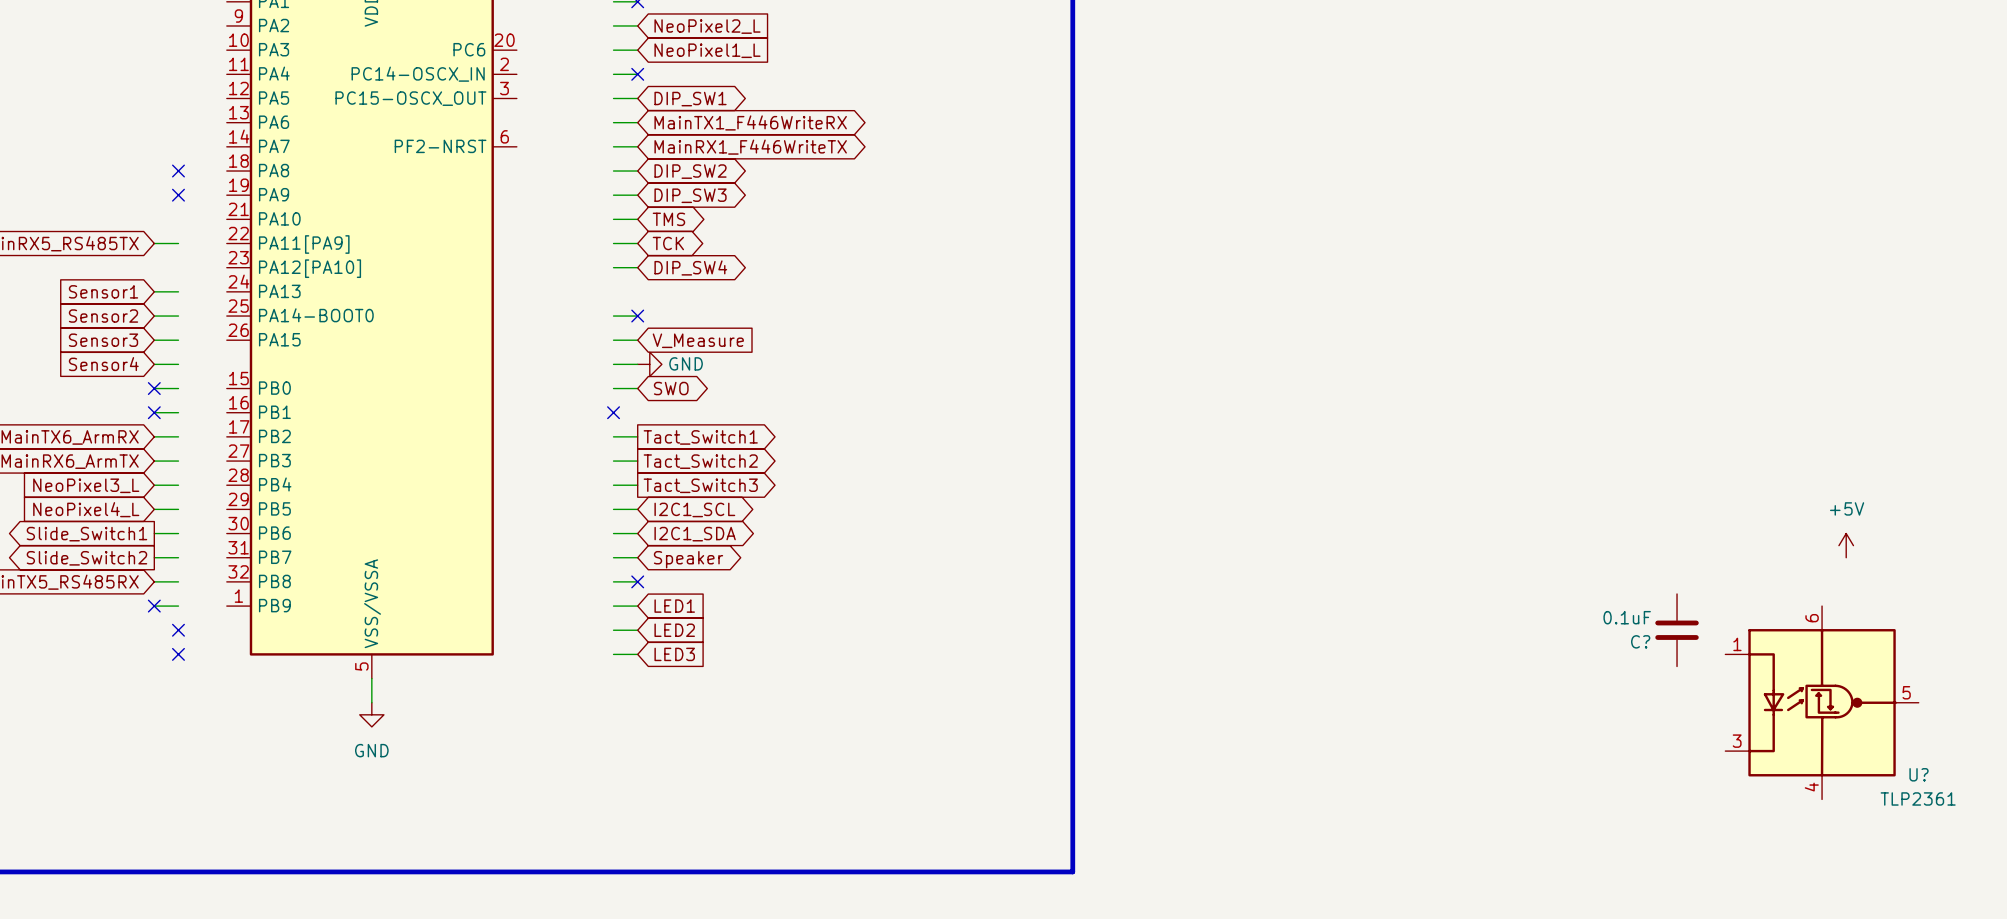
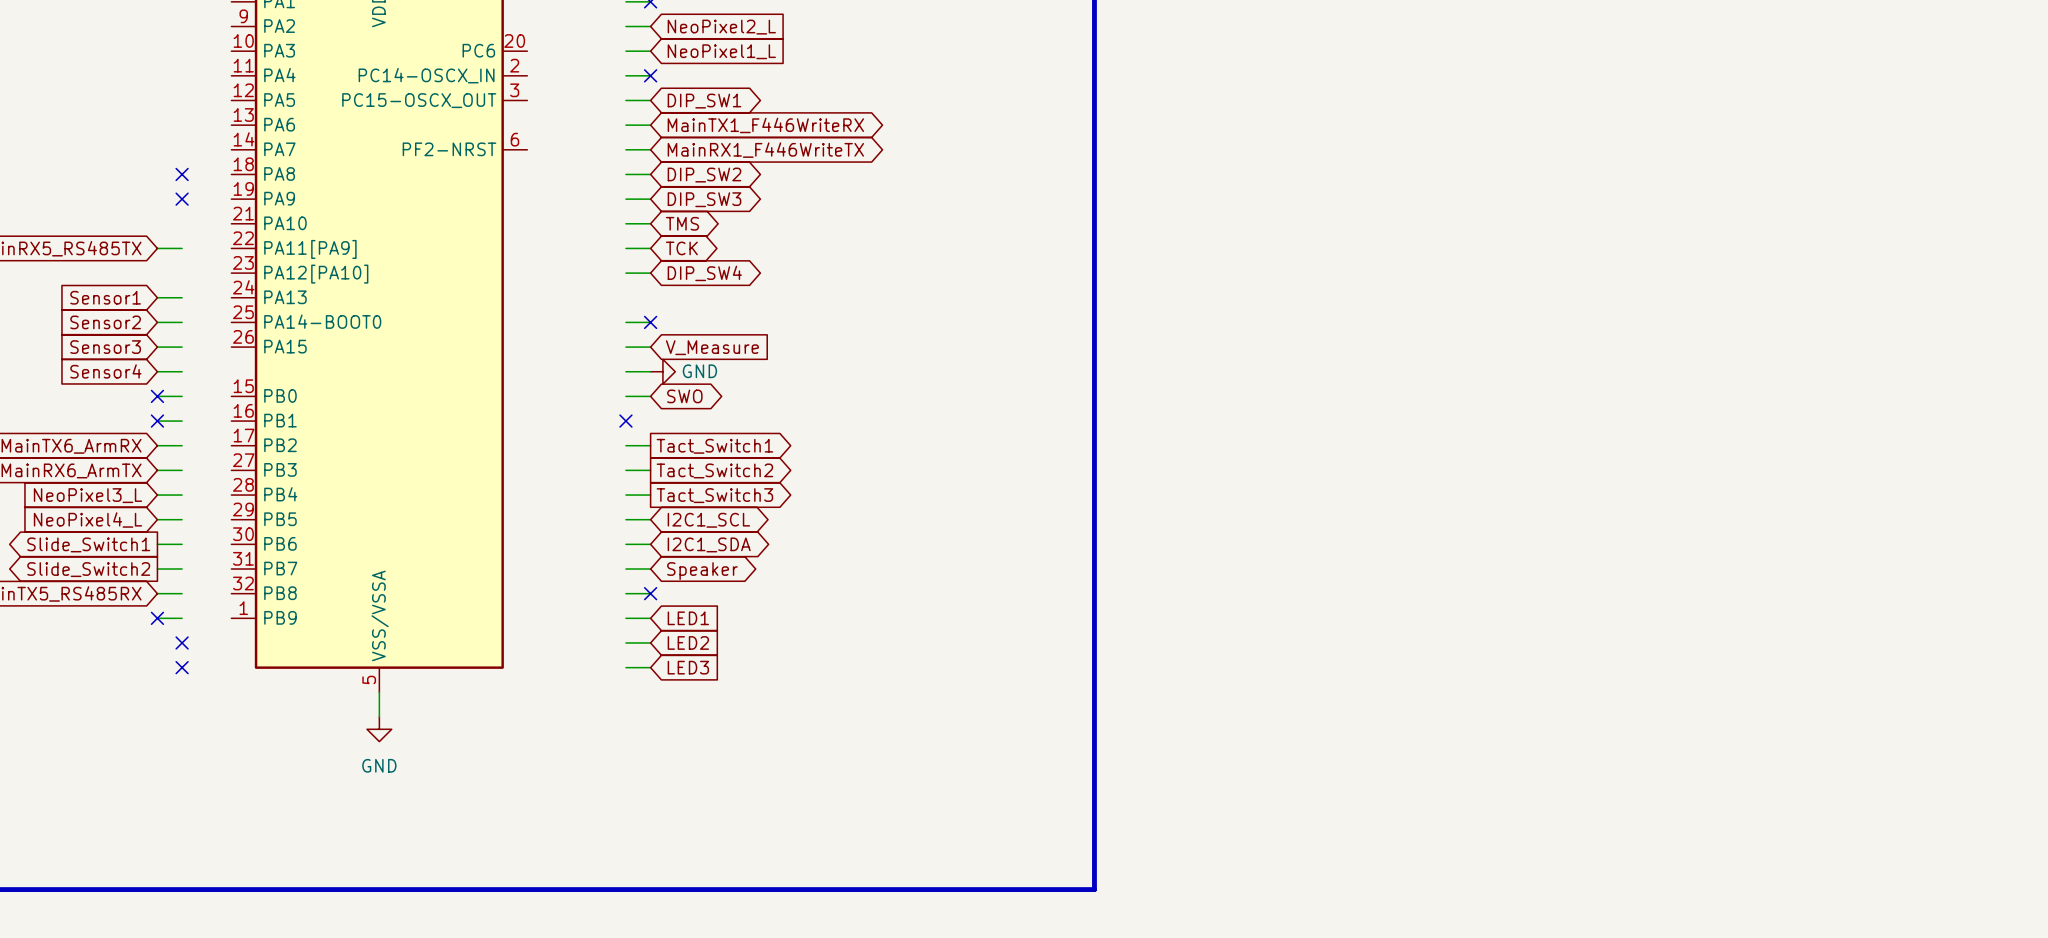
power symbol: +5V (1846, 545) -> none
C?: 0.1uF (1677, 630) -> none
U?: TLP2361 (1822, 702) -> none

